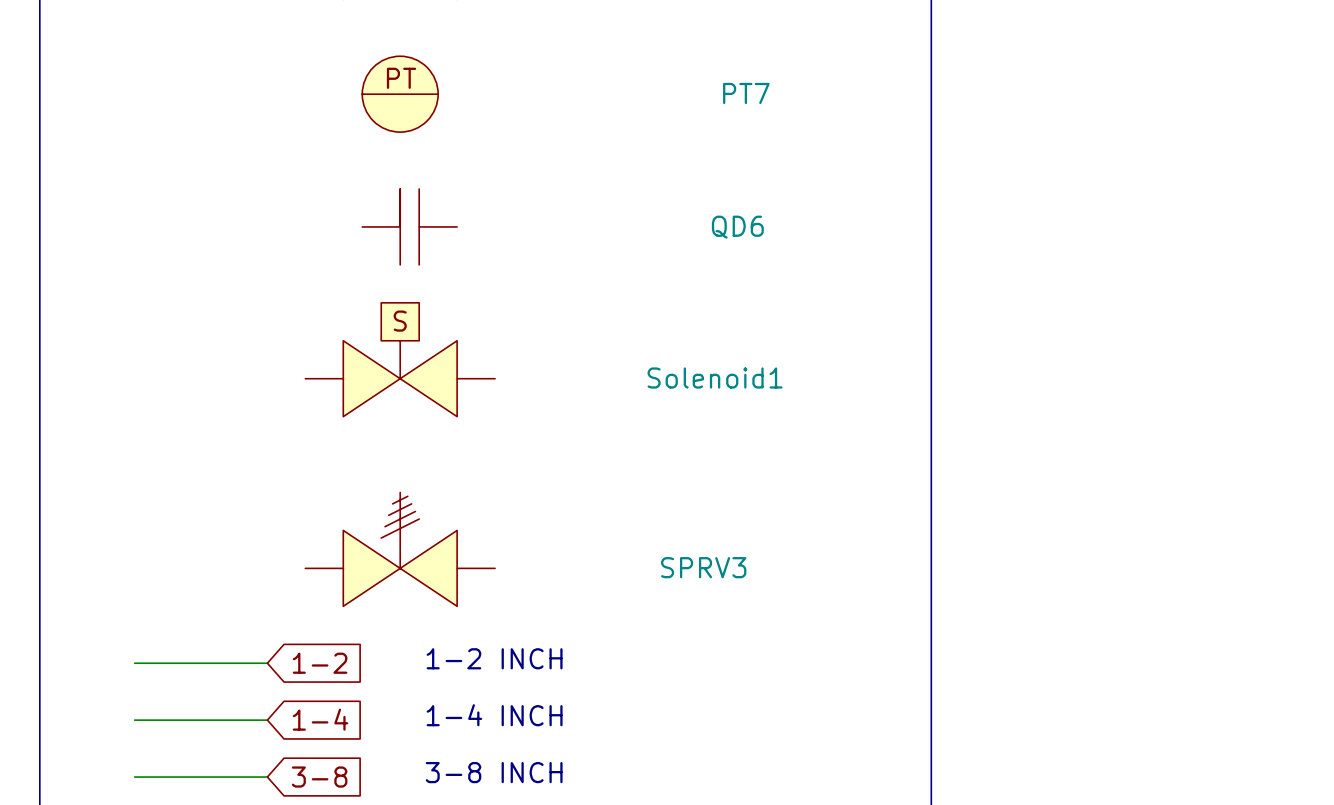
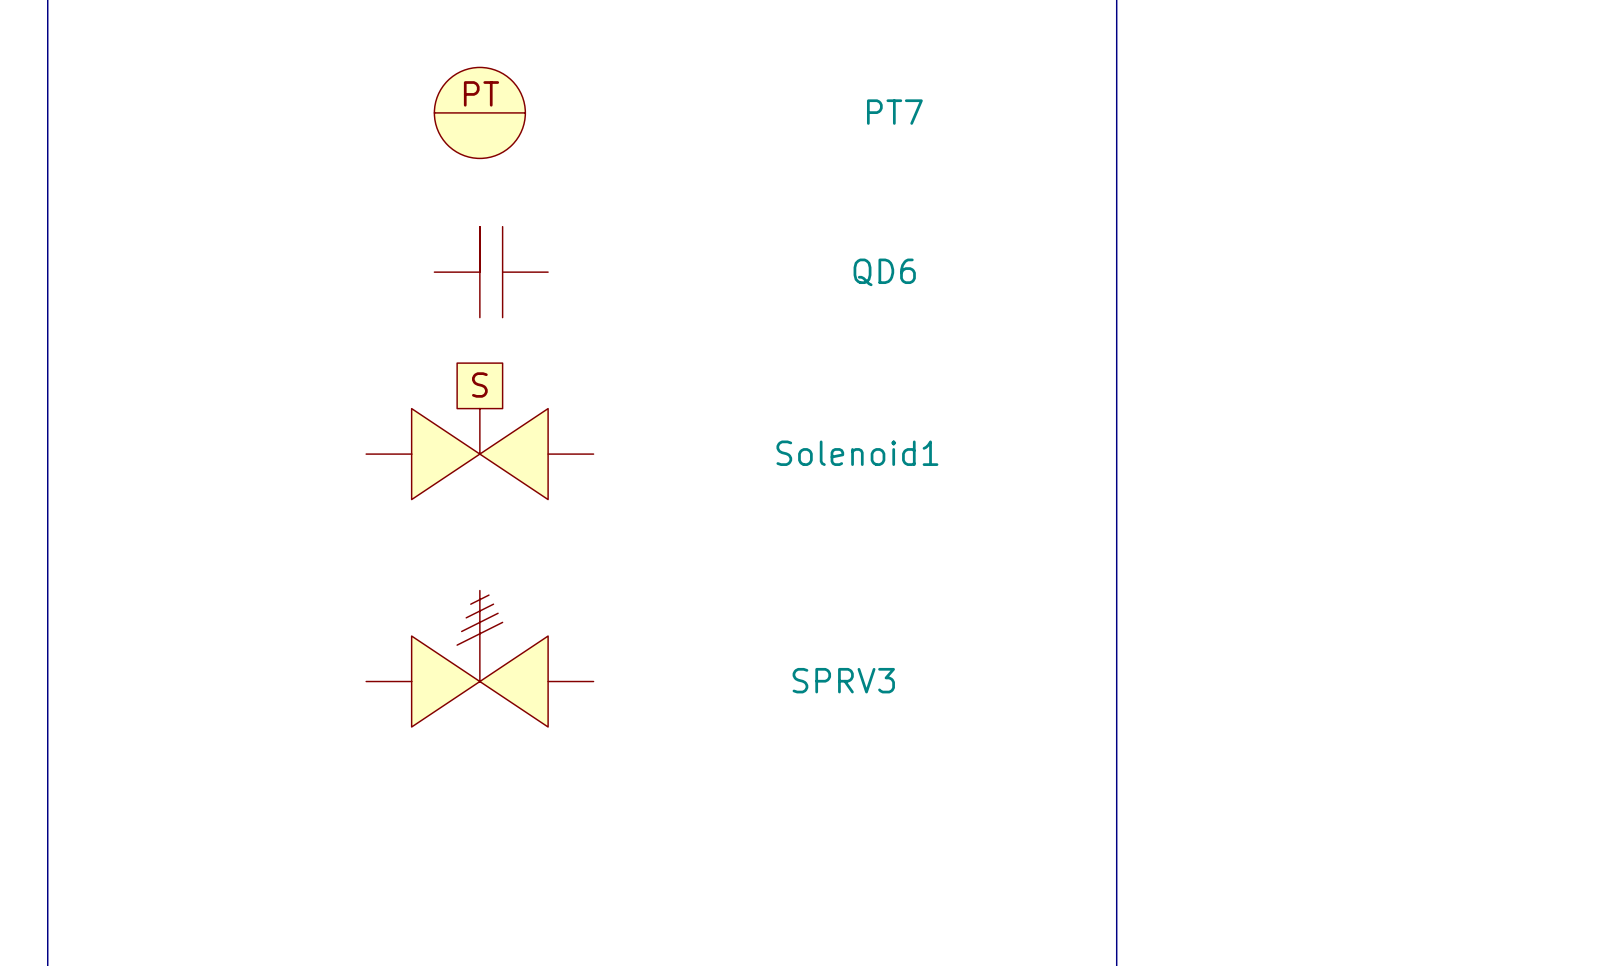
text: 1-2 INCH (494, 658) -> none
wire: (134, 663) (267, 663) -> none
global label: 1-2 (320, 663) -> none
text: 1-4 INCH (494, 715) -> none
global label: 1-4 (320, 719) -> none
wire: (134, 720) (267, 720) -> none
text: 3-8 INCH (494, 772) -> none
wire: (134, 777) (267, 777) -> none
global label: 3-8 (319, 777) -> none

